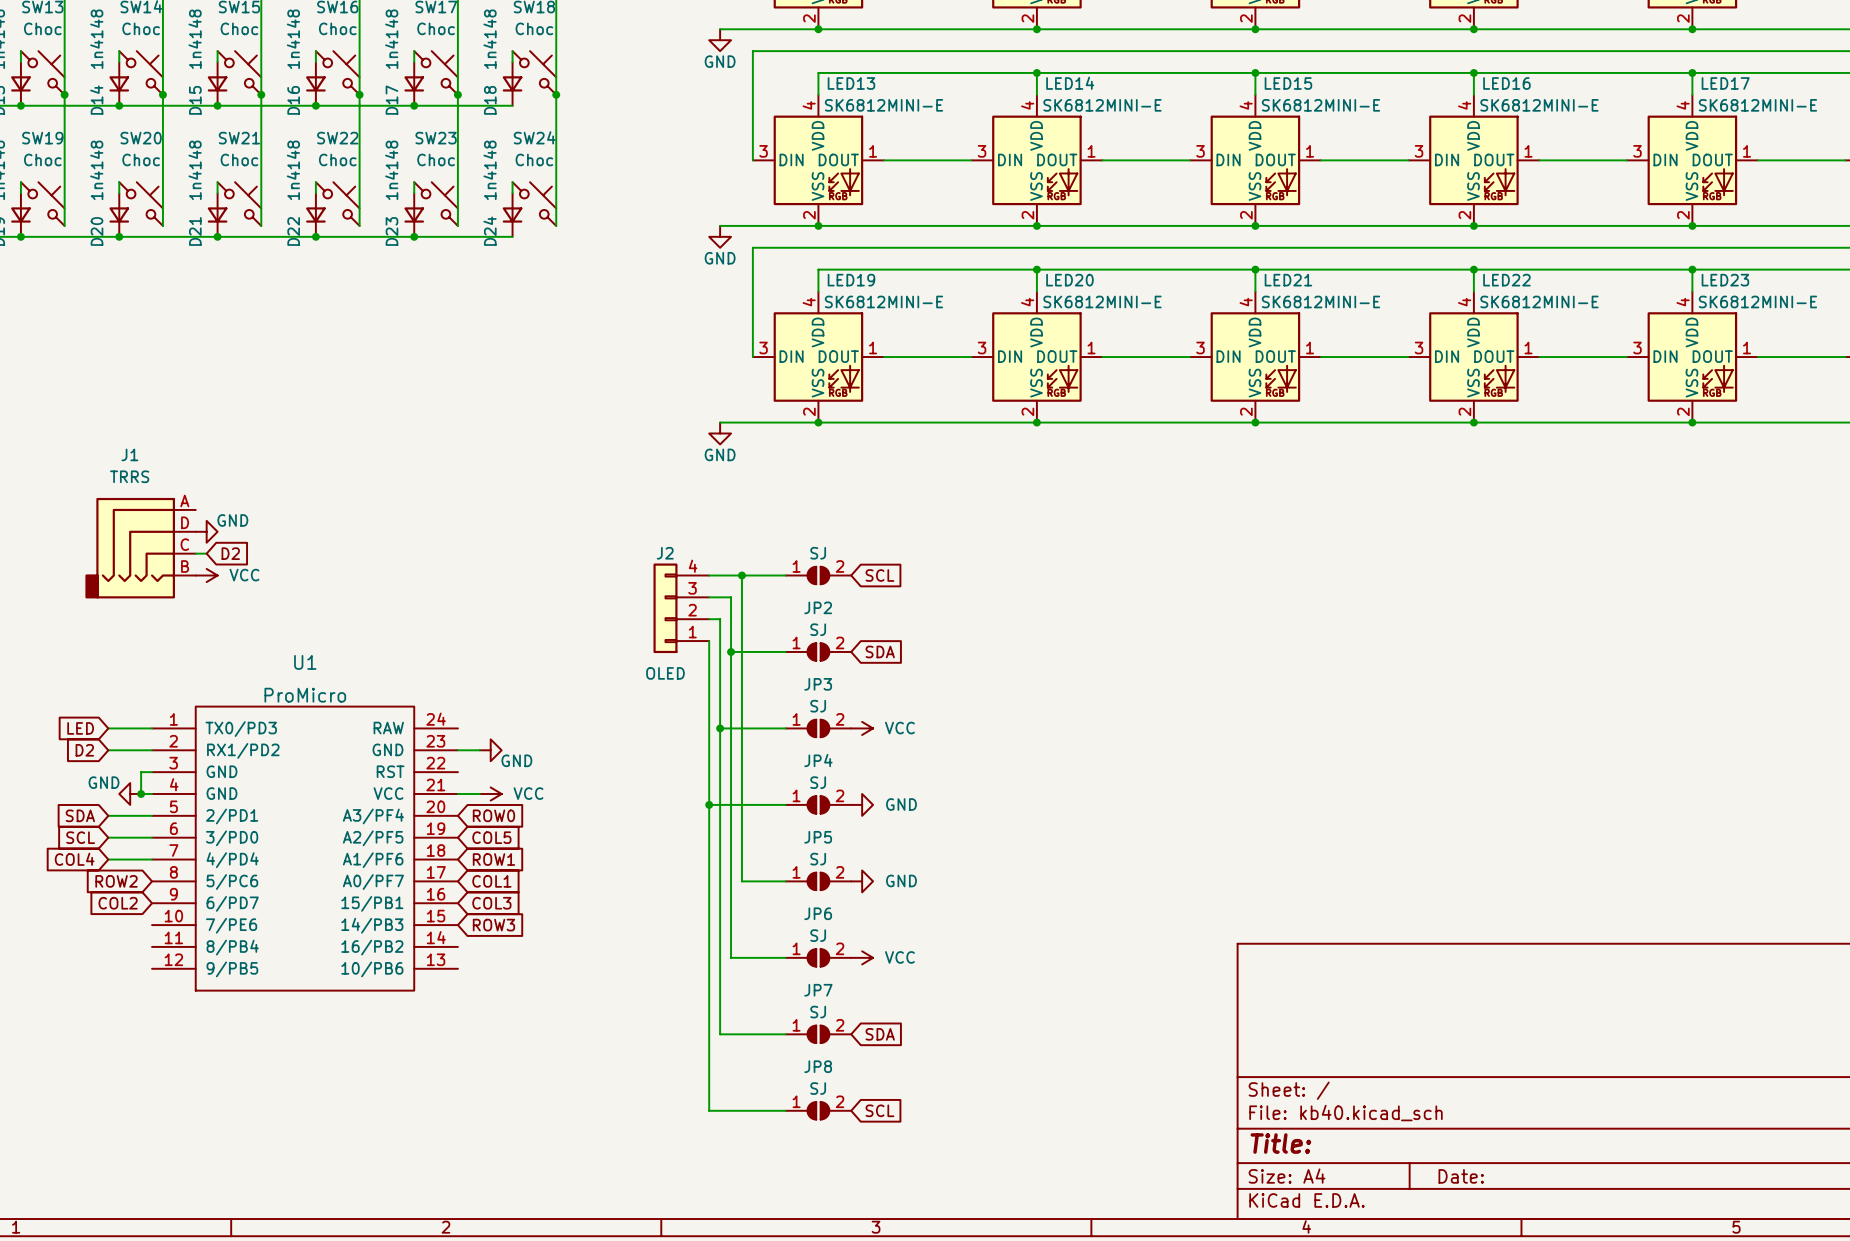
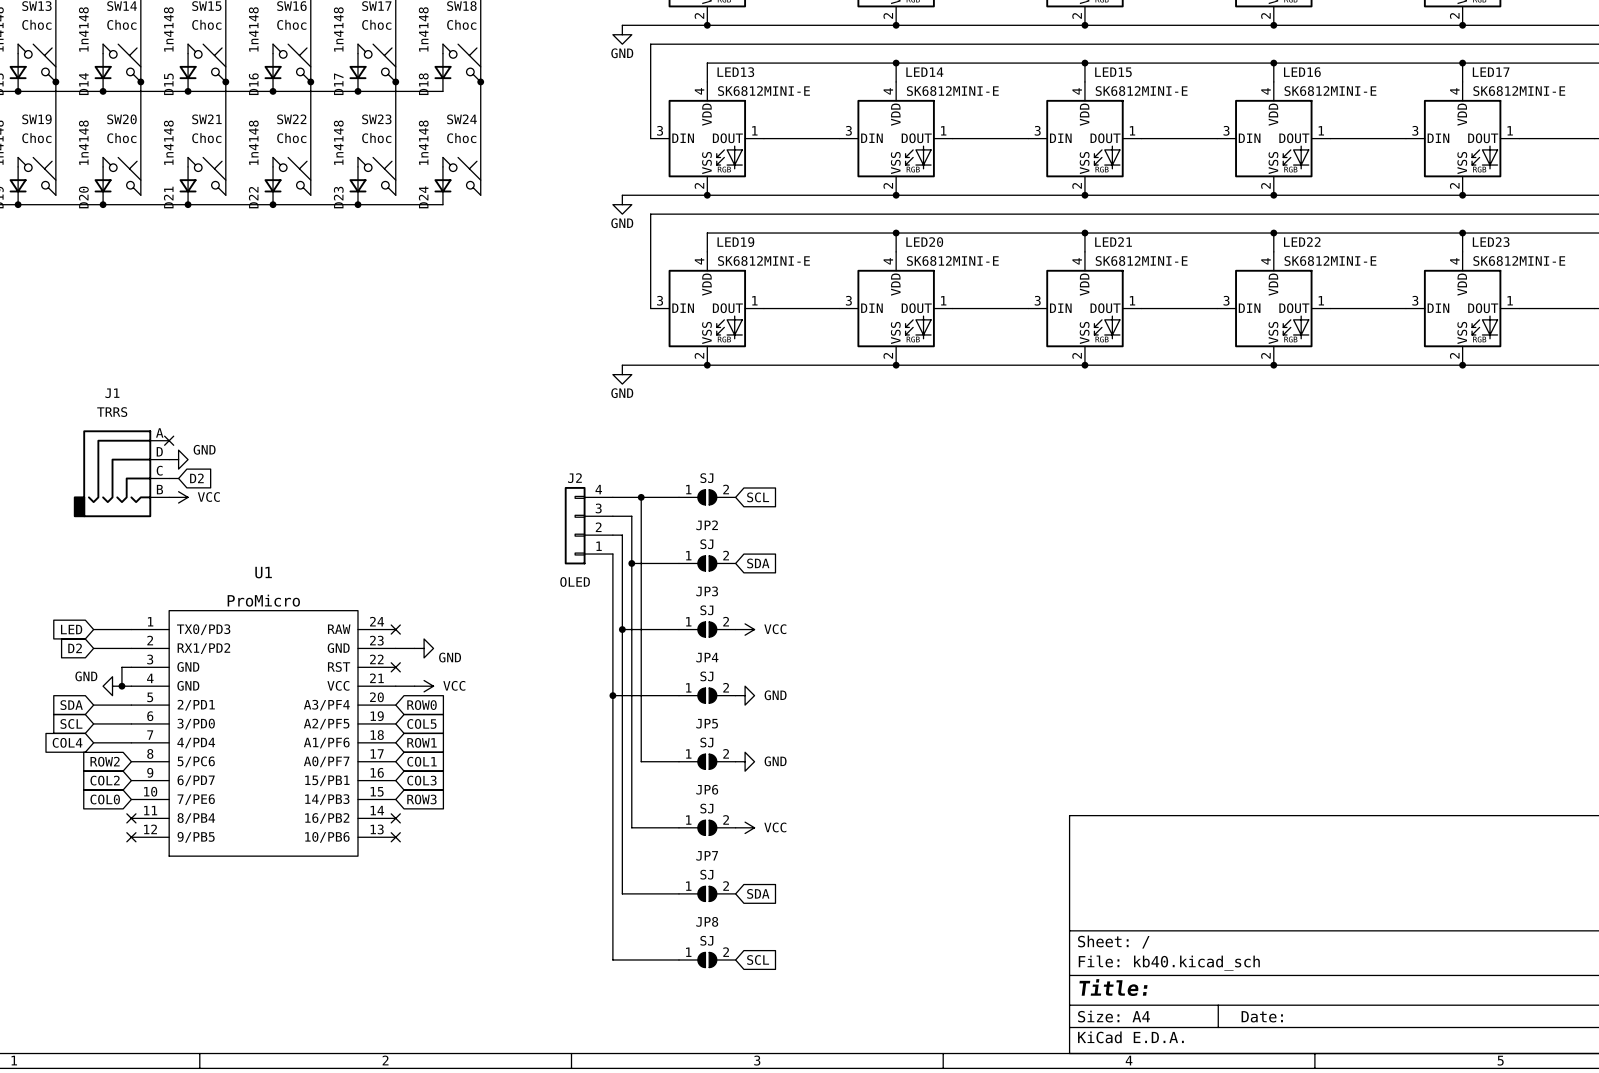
no-connect mark: none -> (169, 440)
no-connect mark: none -> (395, 629)
no-connect mark: none -> (395, 667)
global label: none -> COL0 (105, 799)
no-connect mark: none -> (131, 818)
no-connect mark: none -> (395, 818)
no-connect mark: none -> (131, 837)
no-connect mark: none -> (395, 837)

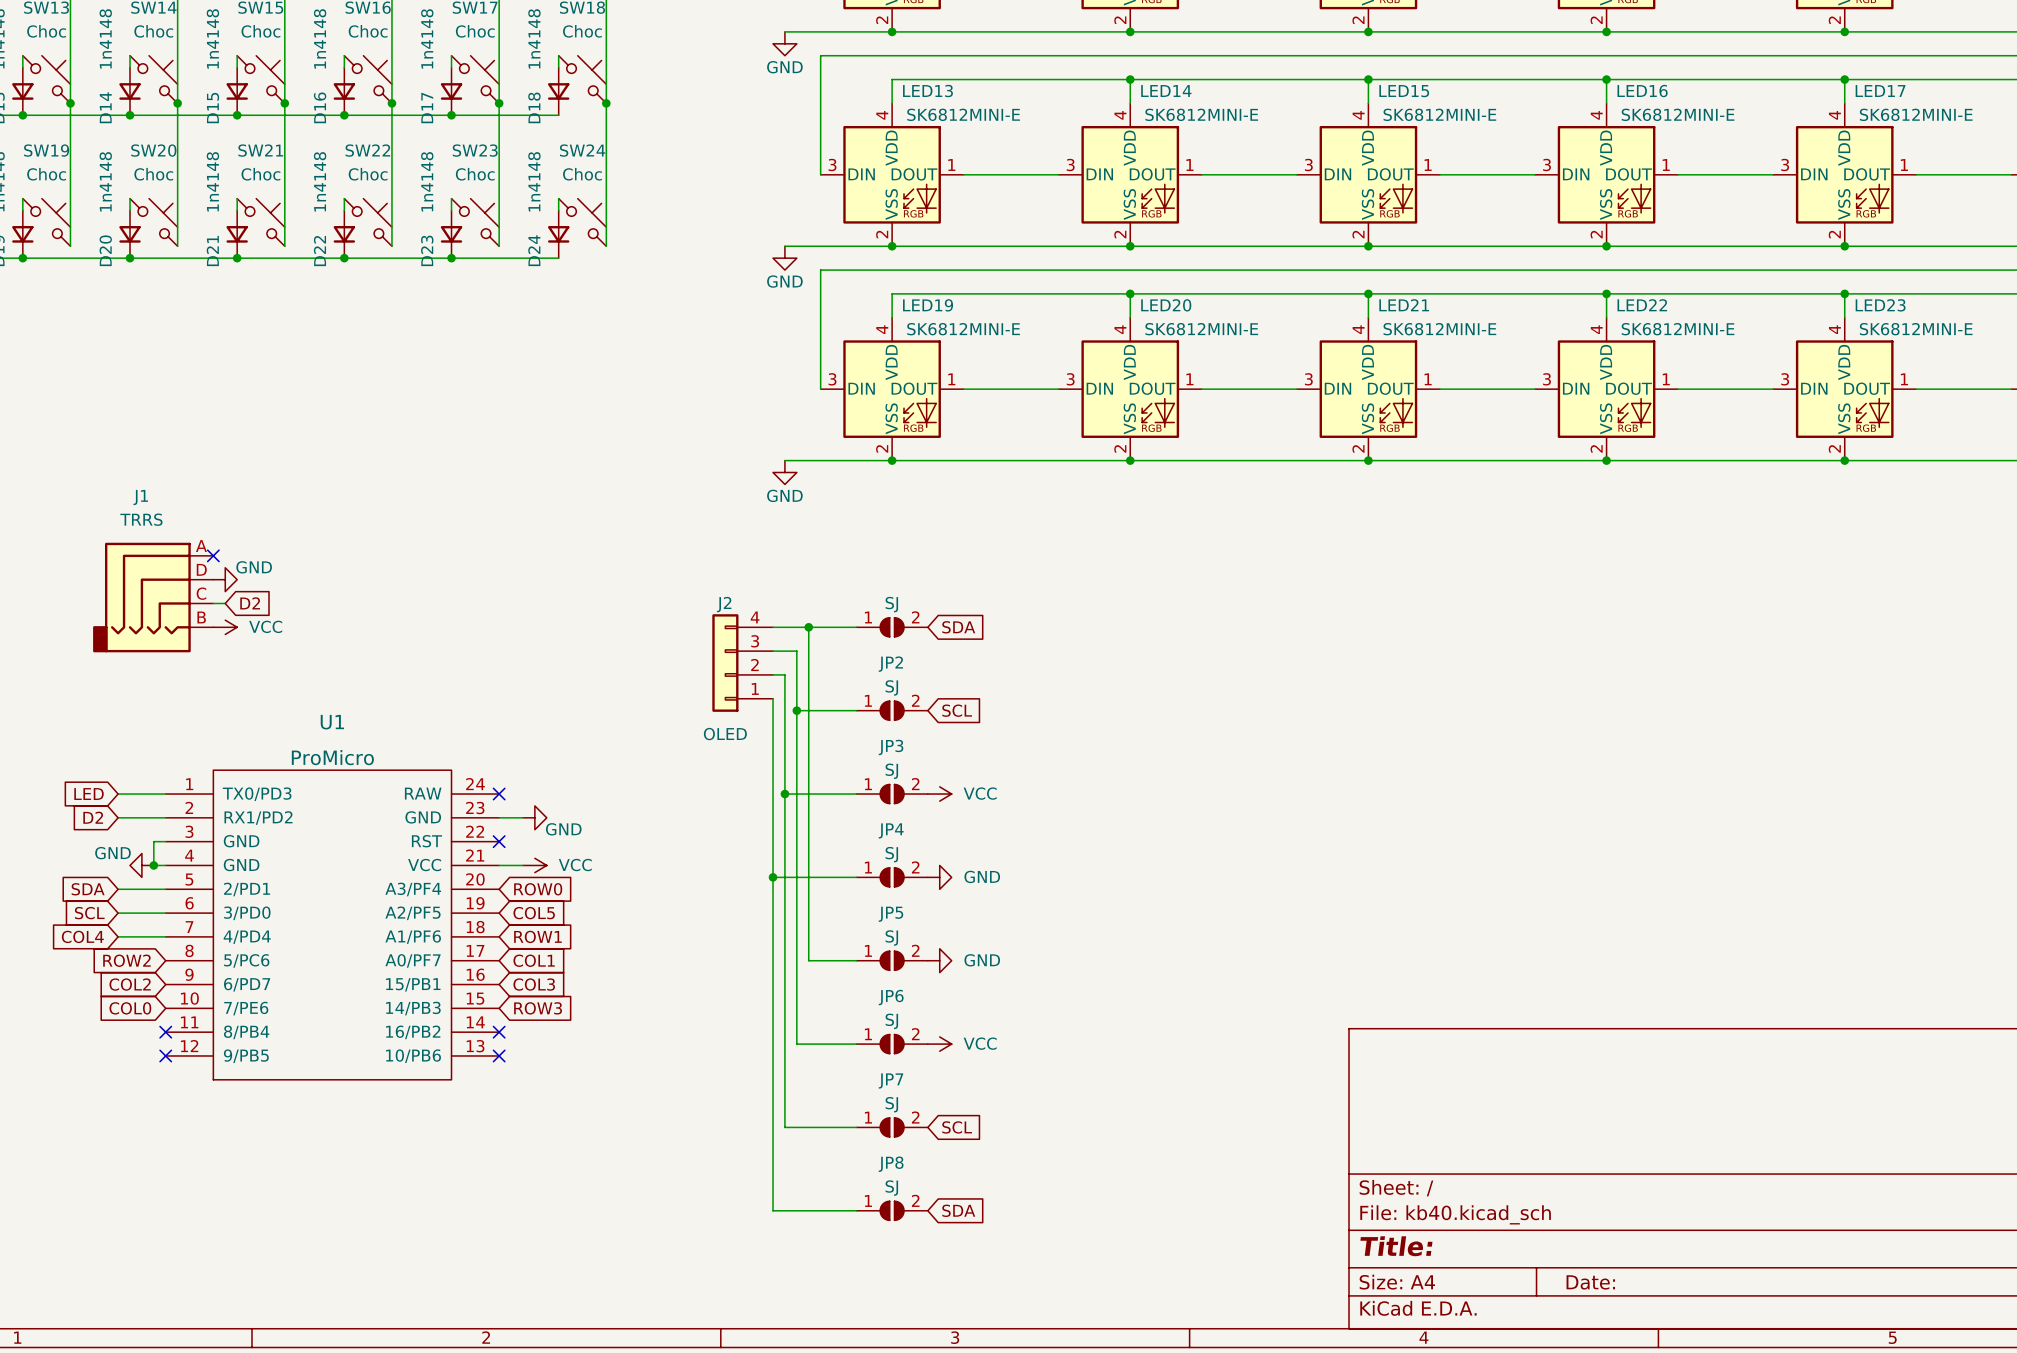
global label: SCL (758, 497) -> SDA (958, 627)
global label: SDA (758, 563) -> SCL (957, 710)
global label: SDA (758, 893) -> SCL (957, 1127)
global label: SCL (758, 960) -> SDA (958, 1210)

